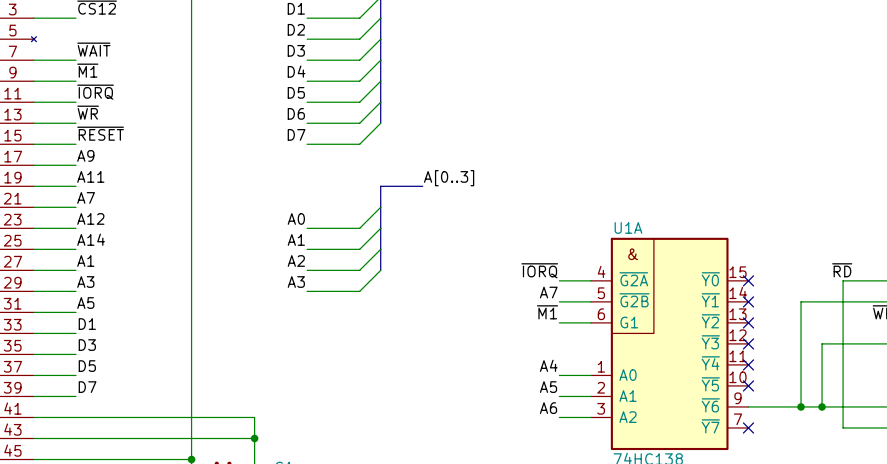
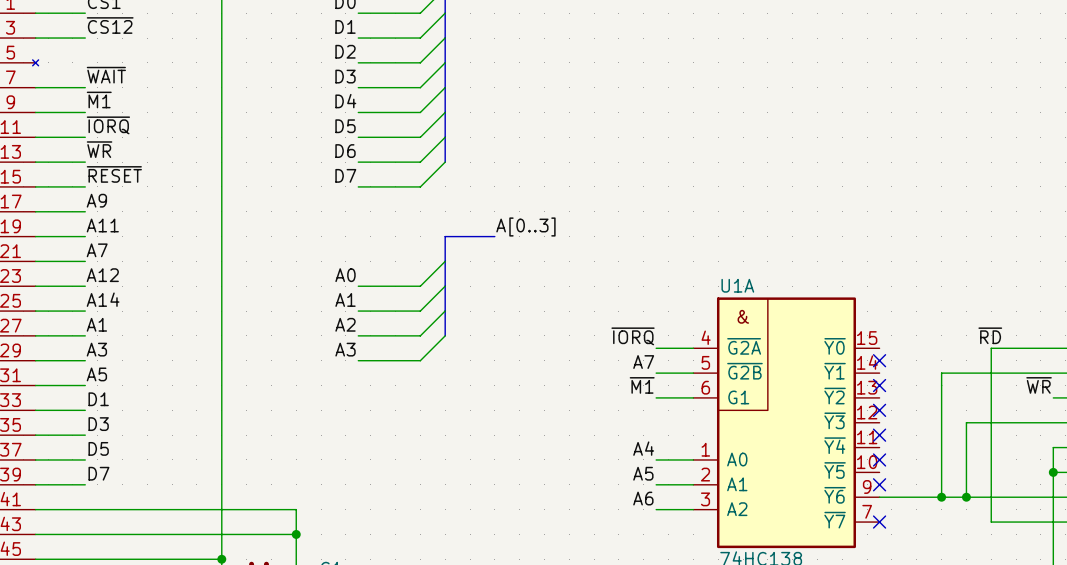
no-connect mark: (748, 280) -> none
no-connect mark: none -> (879, 360)
no-connect mark: (748, 301) -> none
no-connect mark: none -> (879, 385)
no-connect mark: (748, 322) -> none
no-connect mark: none -> (879, 410)
no-connect mark: (748, 343) -> none
no-connect mark: none -> (879, 435)
no-connect mark: (748, 364) -> none
no-connect mark: none -> (879, 459)
no-connect mark: (748, 385) -> none
no-connect mark: none -> (879, 484)

